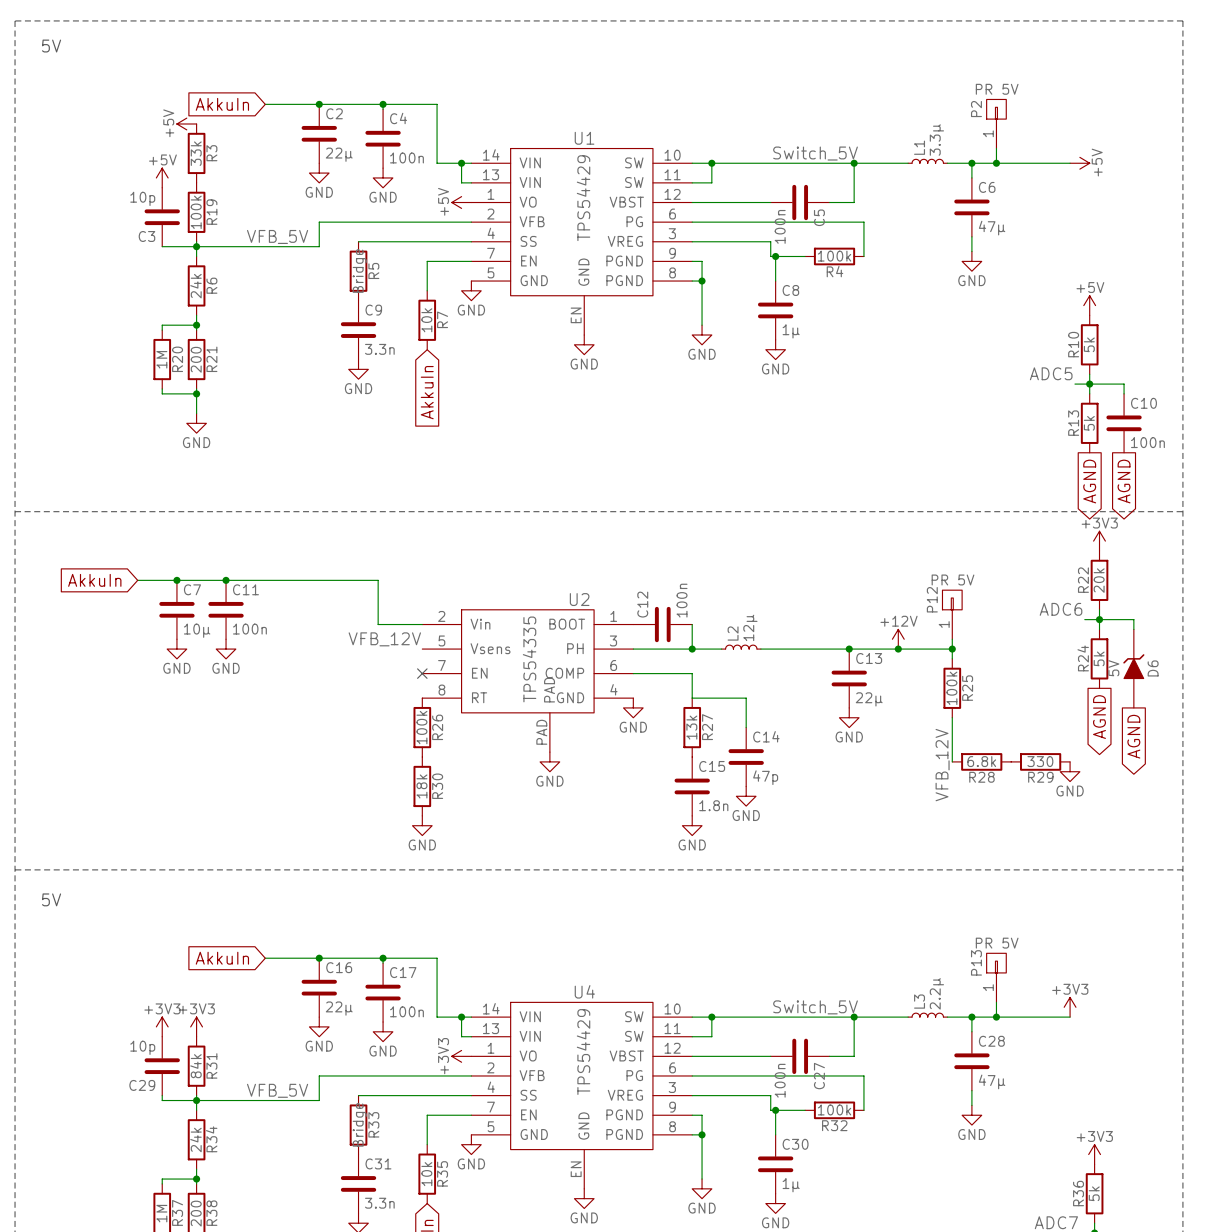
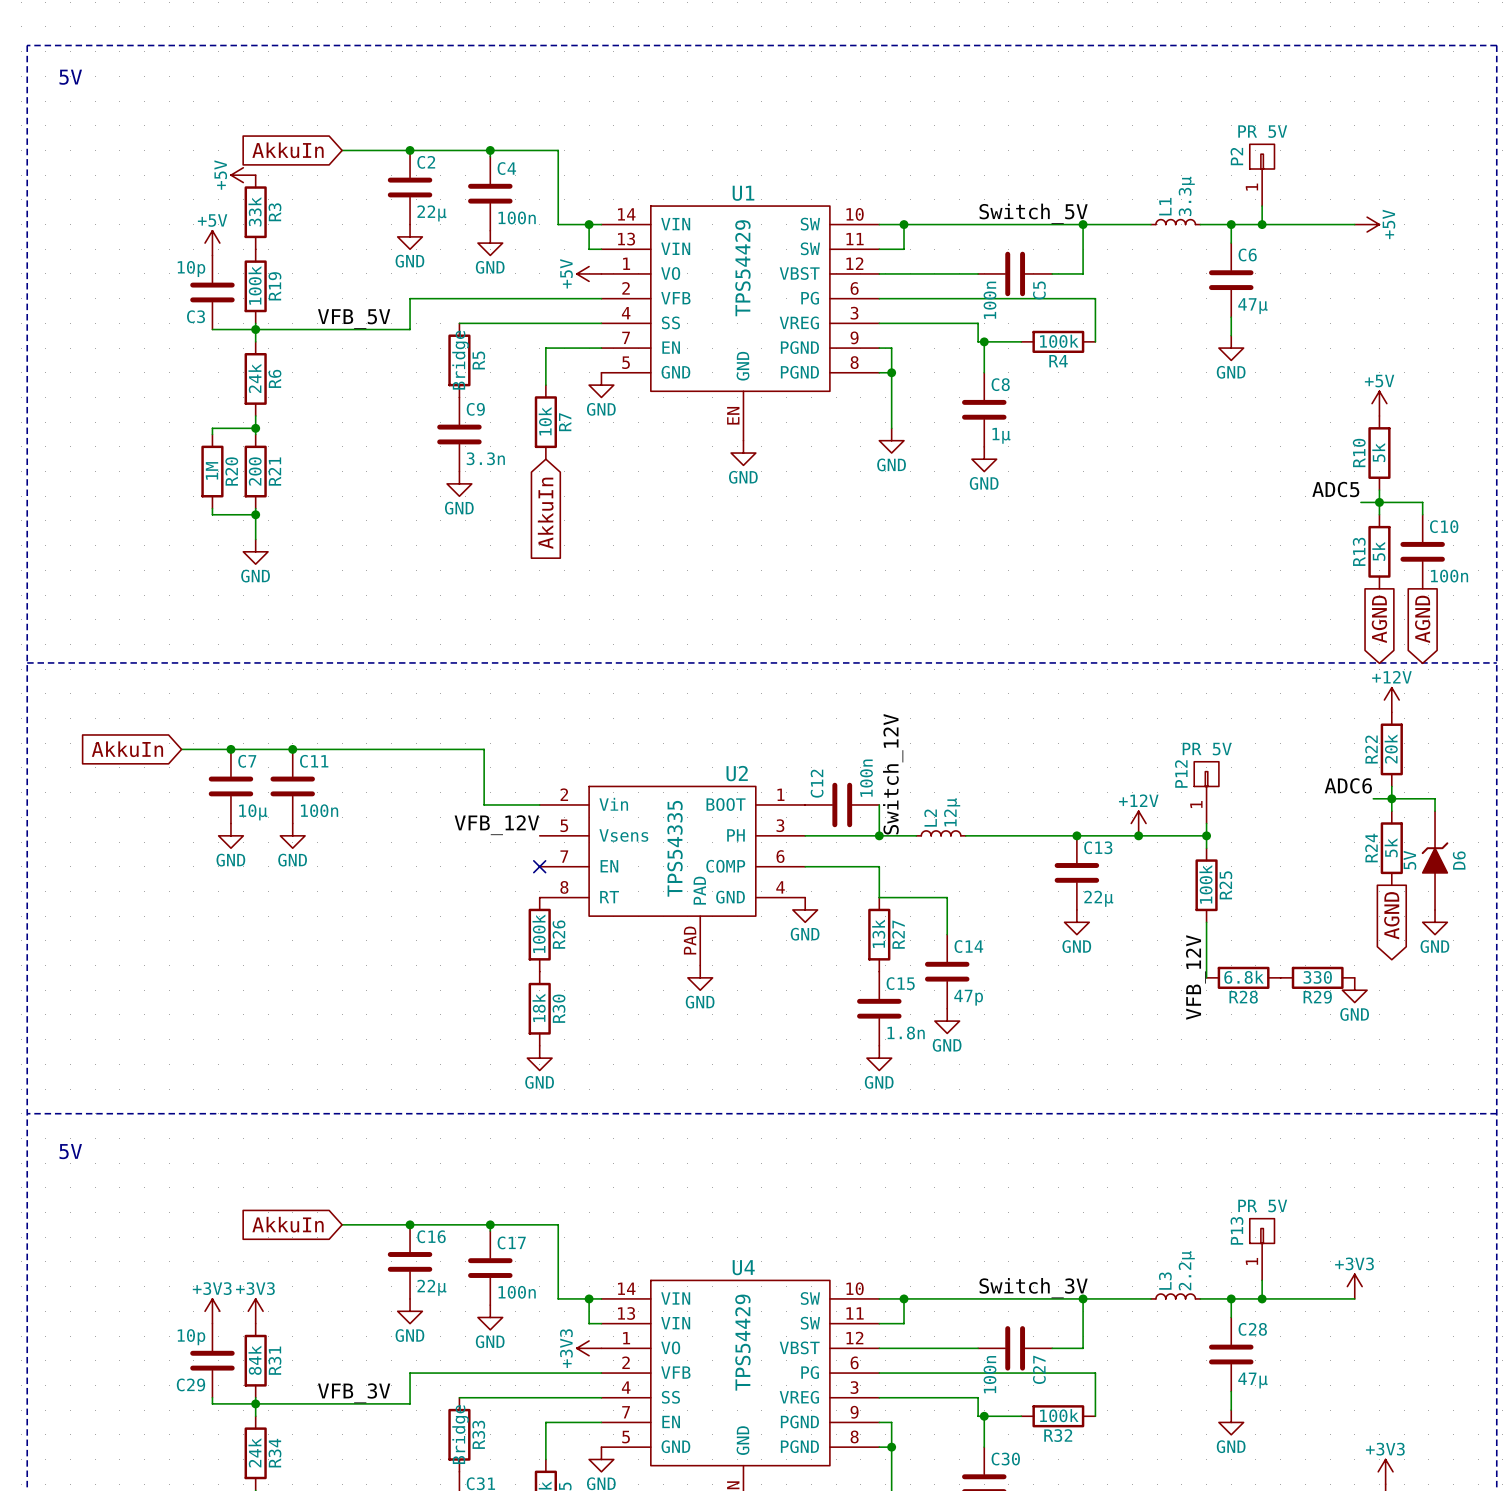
power symbol: +3V3 (1099, 541) -> +12V (1391, 700)
label: none -> Switch_12V (893, 774)
power symbol: none -> GND (1435, 922)
global label: AGND (1133, 736) -> none
label: Switch_5V (815, 1007) -> Switch_3V (1033, 1288)
label: VFB_5V (277, 1090) -> VFB_3V (354, 1393)

